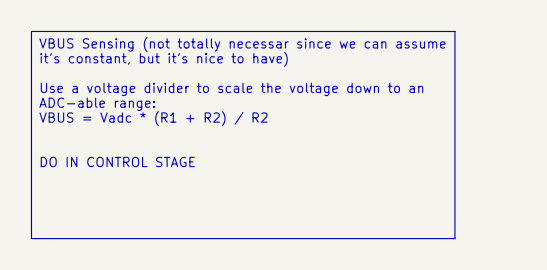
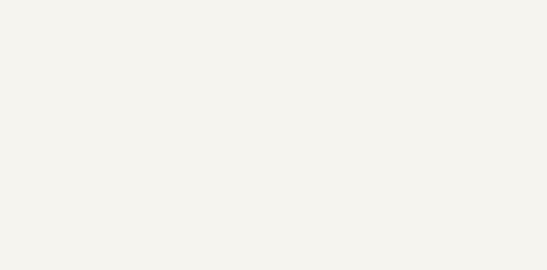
line: (31, 31) (454, 31) (454, 238) (31, 238) (31, 31) -> none
text: VBUS Sensing (not totally necessar since we can assume (242, 44) -> none
text: it's constant, but it's nice to have) (164, 59) -> none
text: Use a voltage divider to scale the voltage down to an (231, 89) -> none
text: ADC-able range: (97, 104) -> none
text: VBUS = Vadc * (R1 + R2) / R2 (153, 118) -> none
text: DO IN CONTROL STAGE (117, 161) -> none

